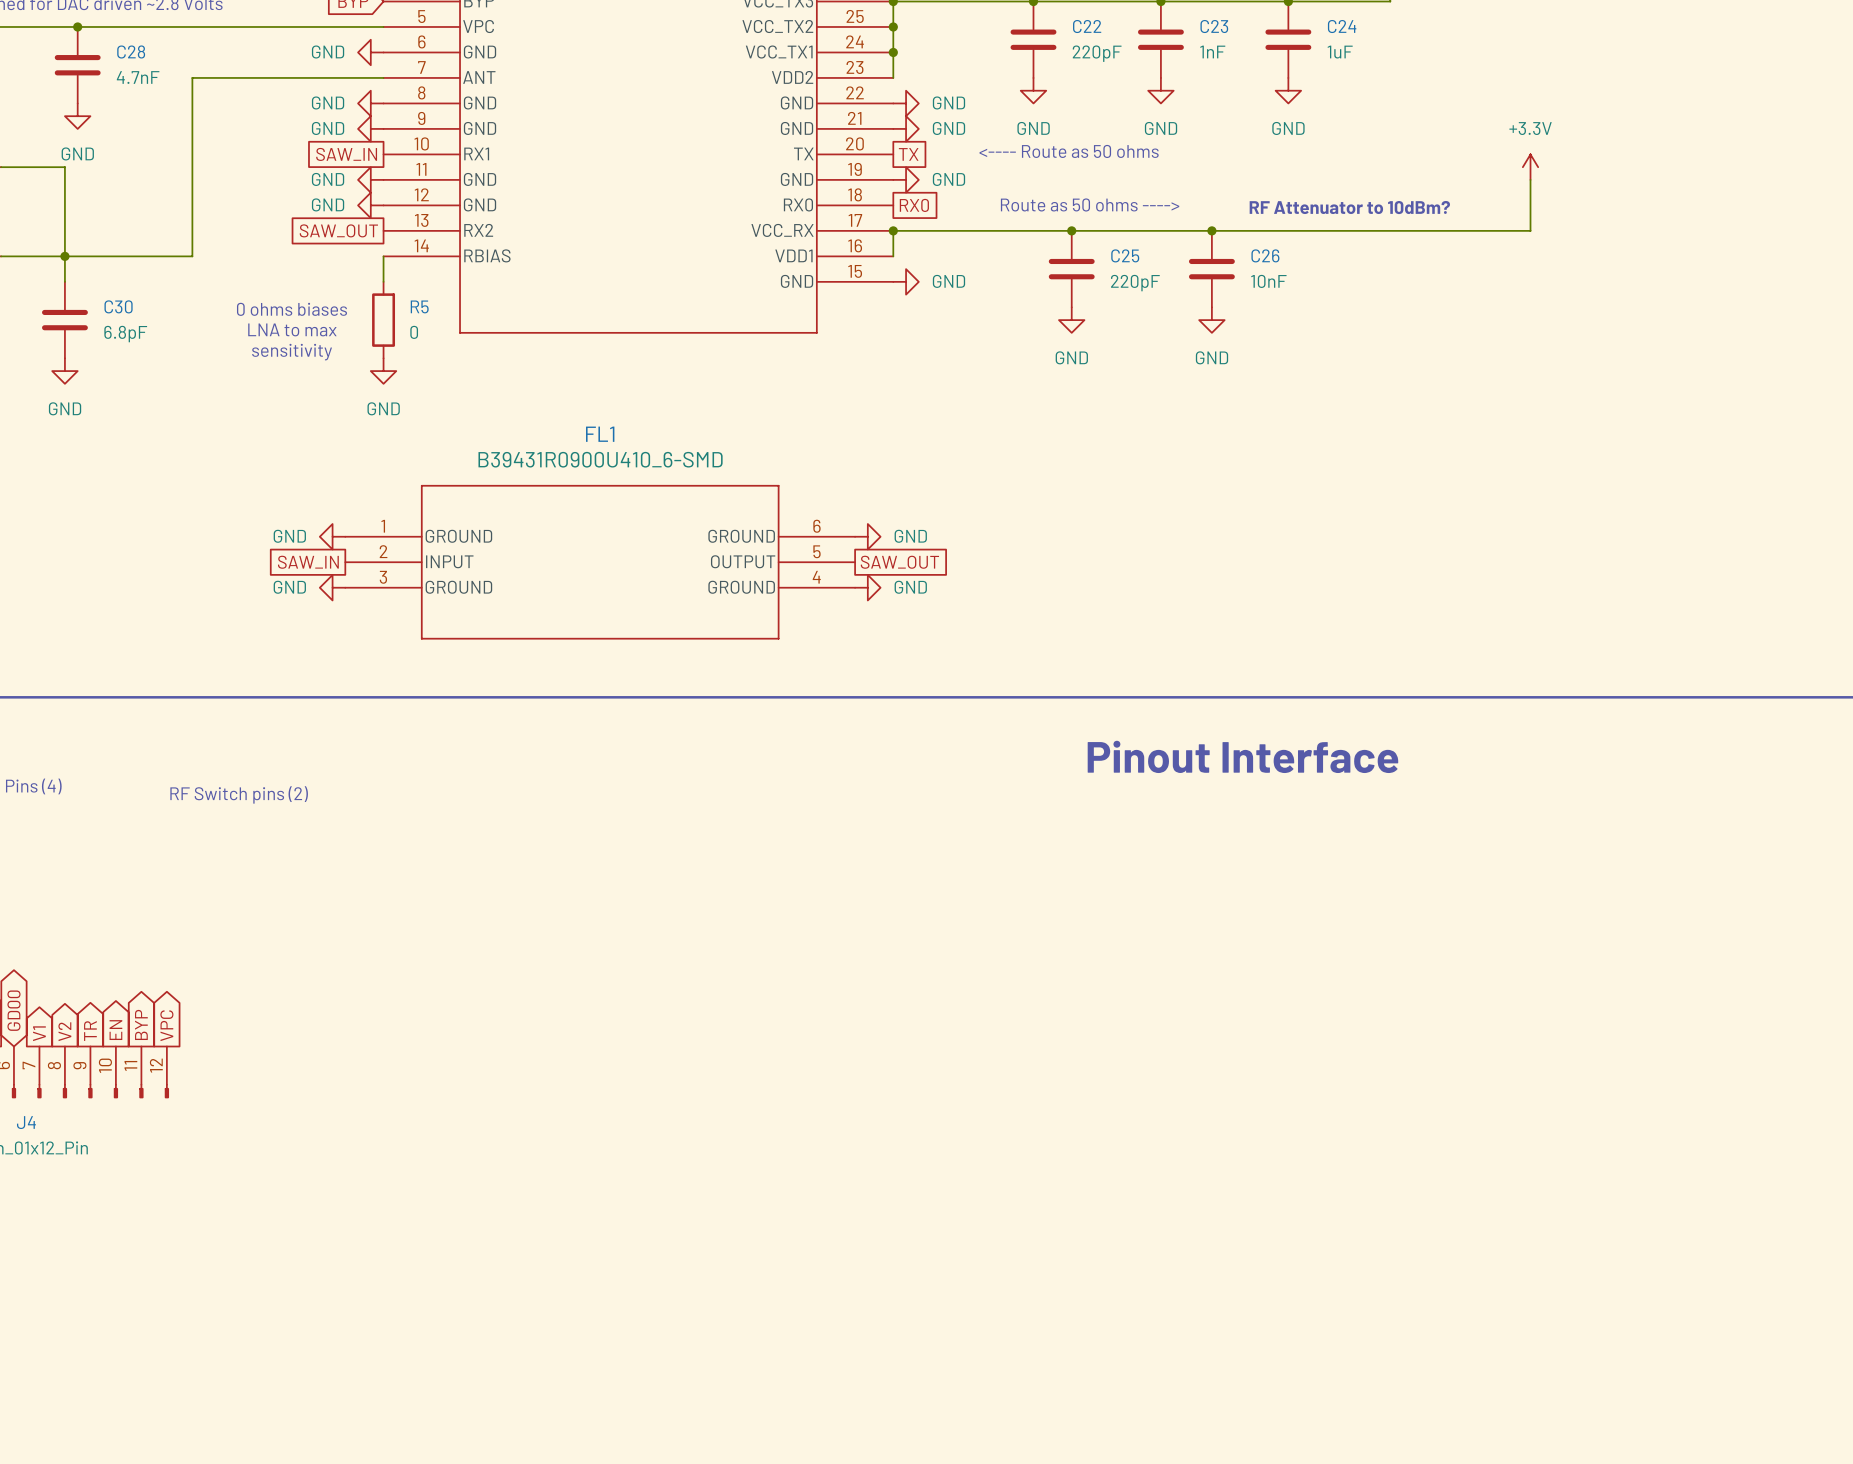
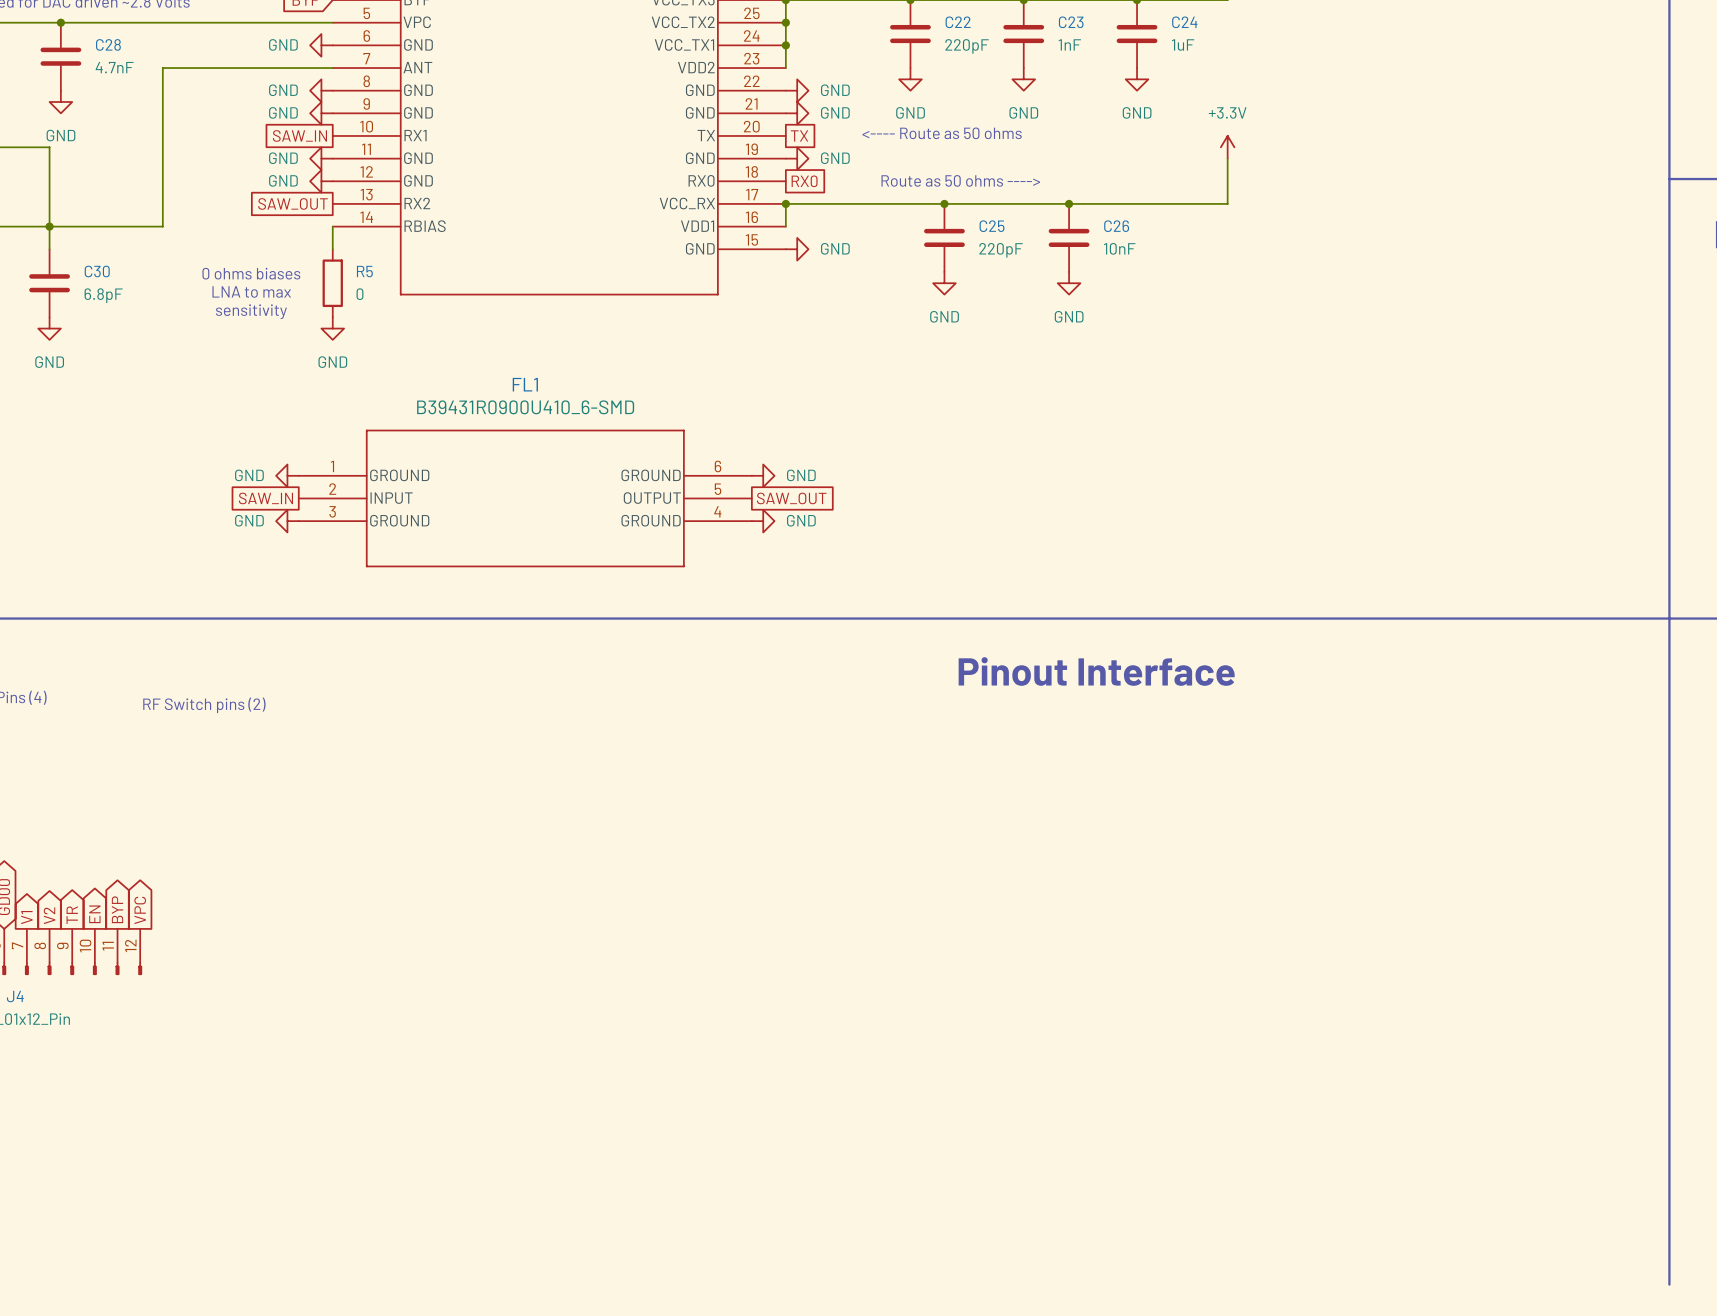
power symbol position: +3.3V (1530, 167) -> +3.3V (1227, 147)
wire: (1530, 179) (1530, 230) (1390, 230) -> (1227, 158) (1227, 203)
text: RF Attenuator to 10dBm? (1349, 207) -> none

